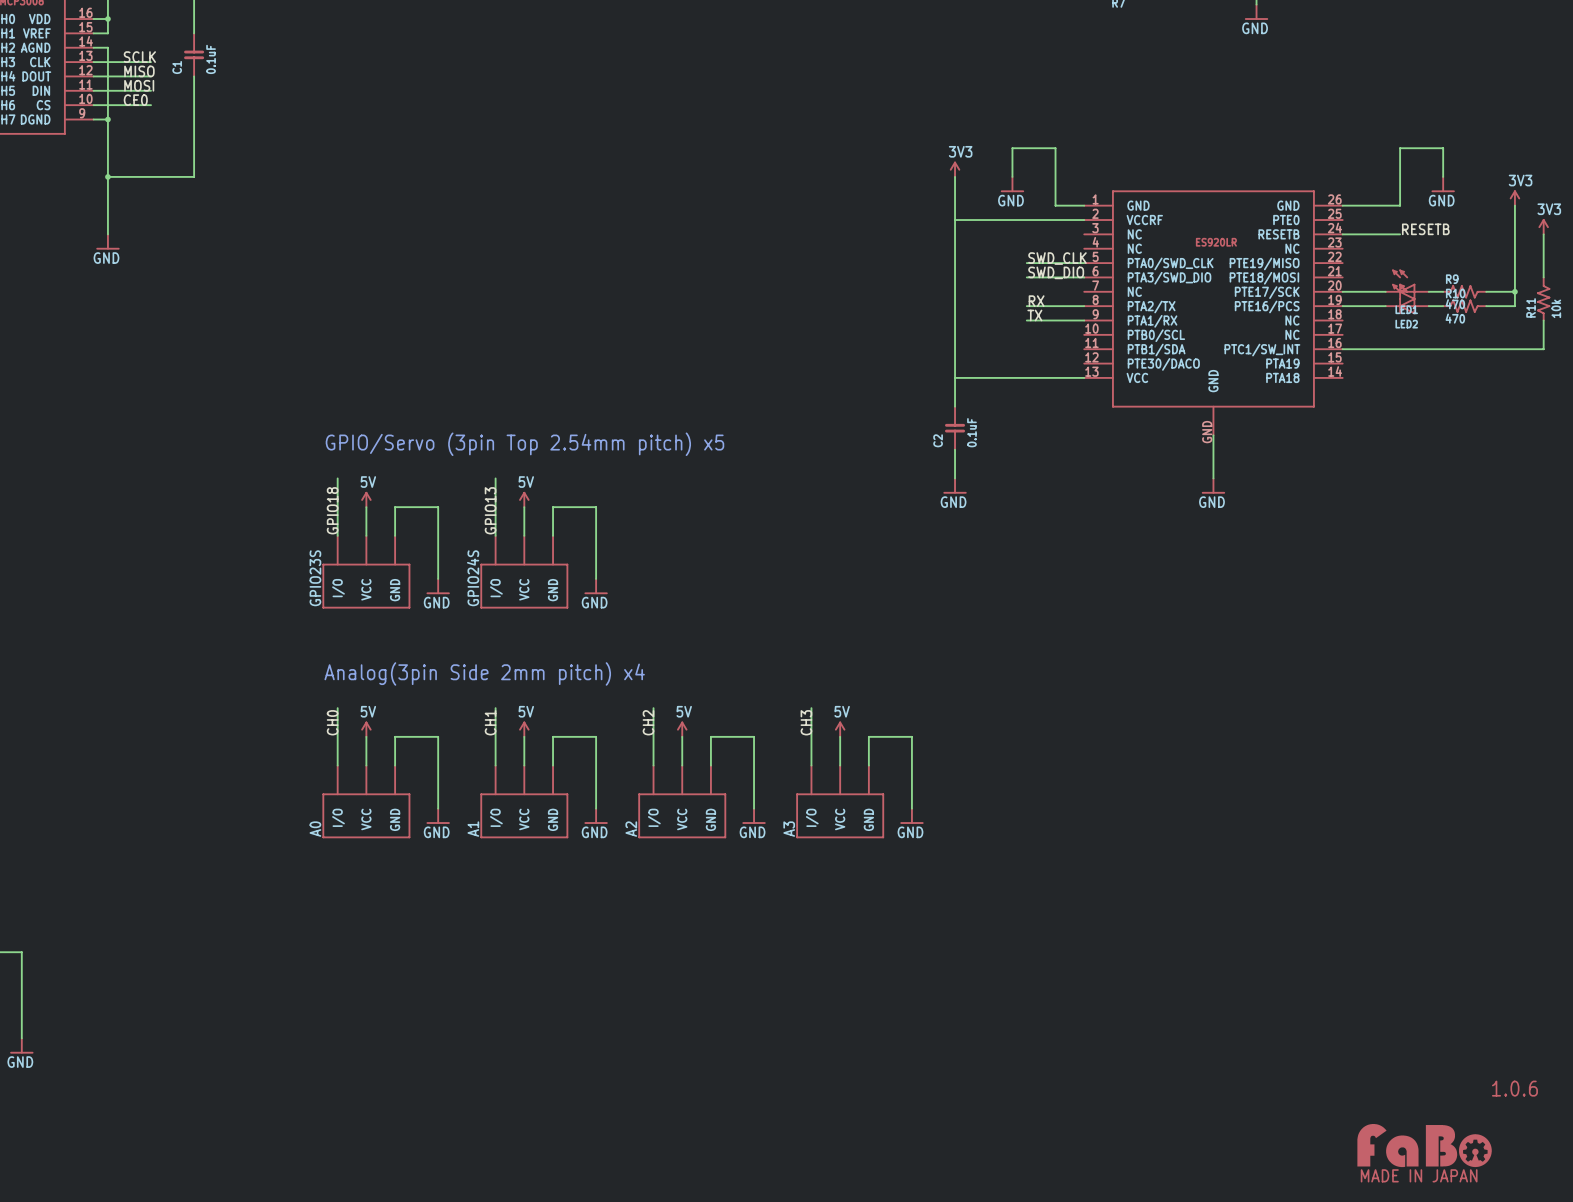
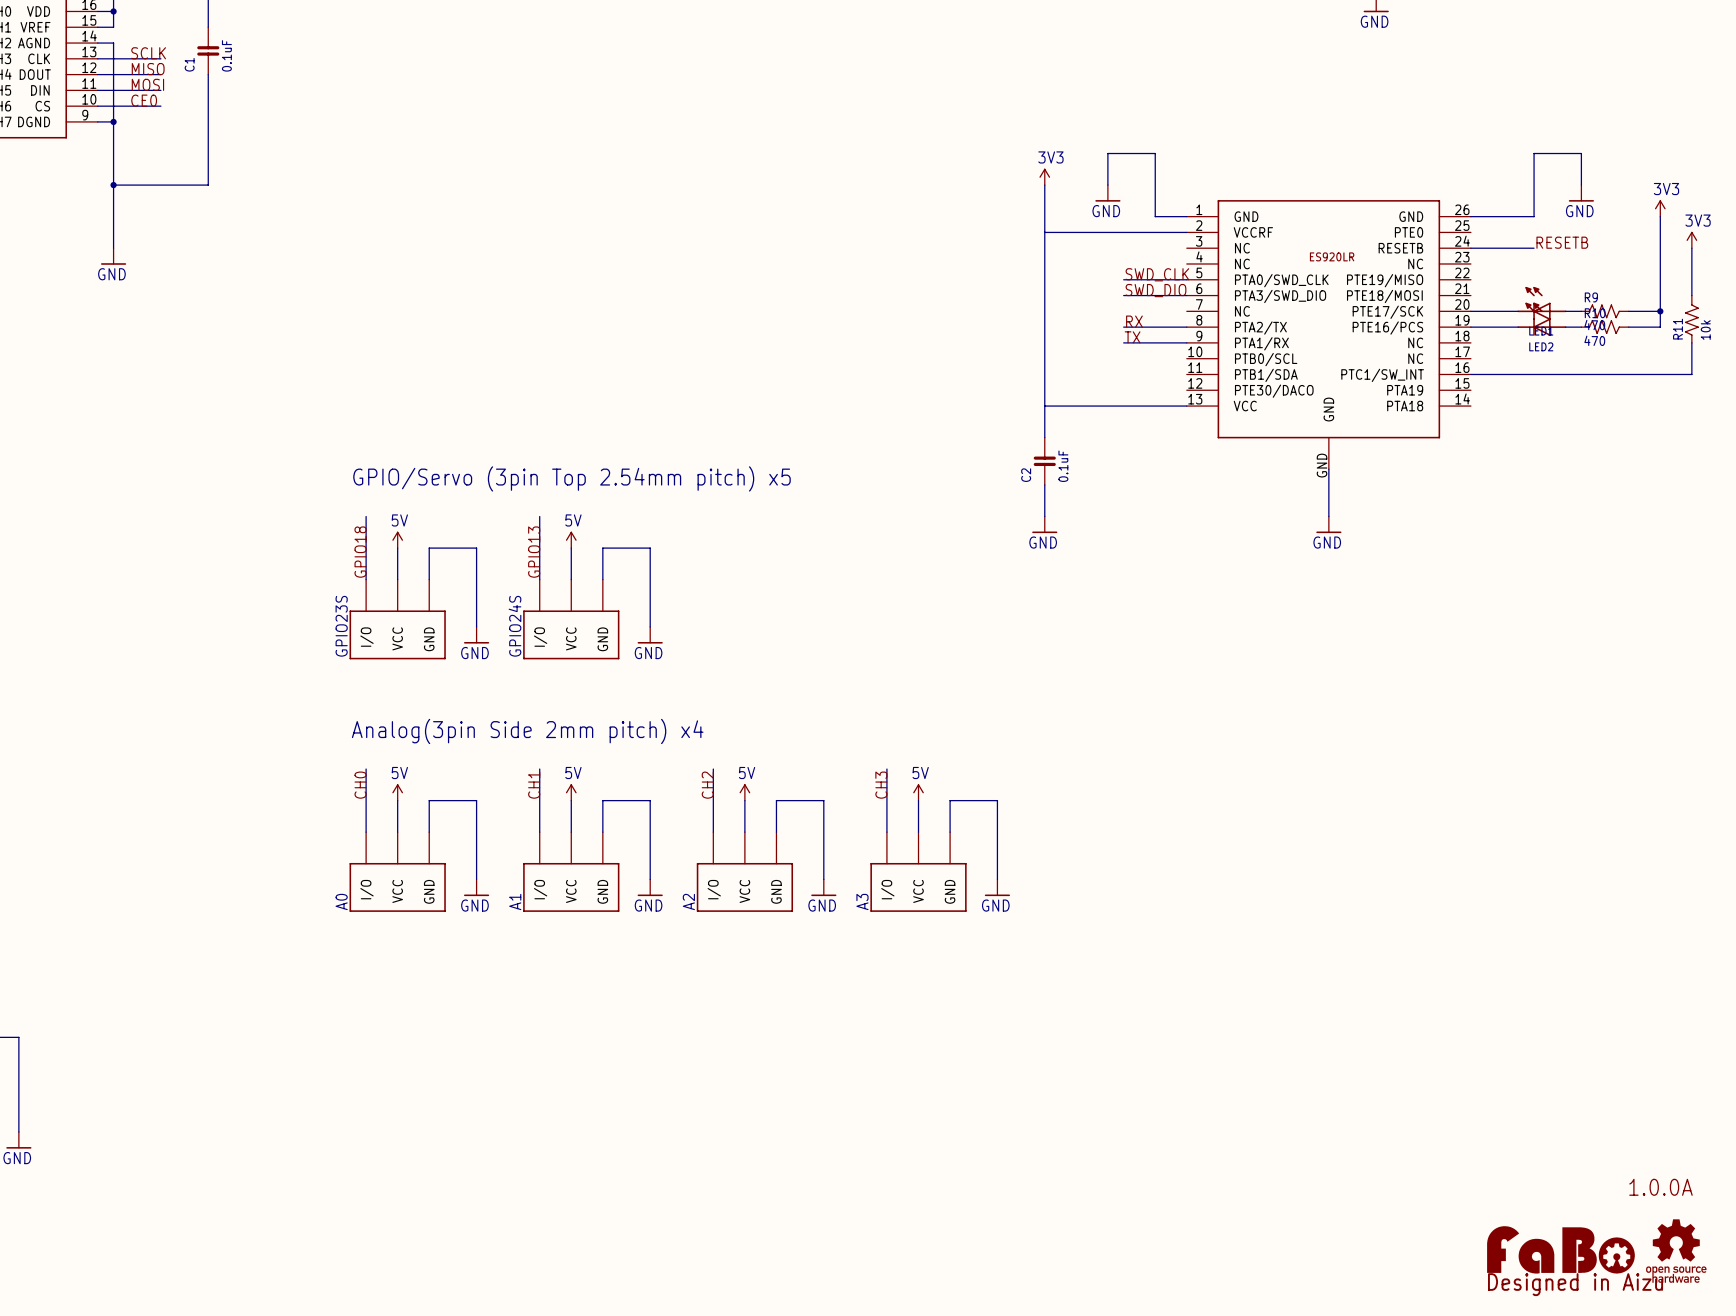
text: 1.0.6 (1514, 1088) -> 1.0.0A (1660, 1187)
part: none -> (1676, 1251)
part text: MADE IN JAPAN (1419, 1175) -> none
part text: none -> Designed in Aizu (1575, 1284)

